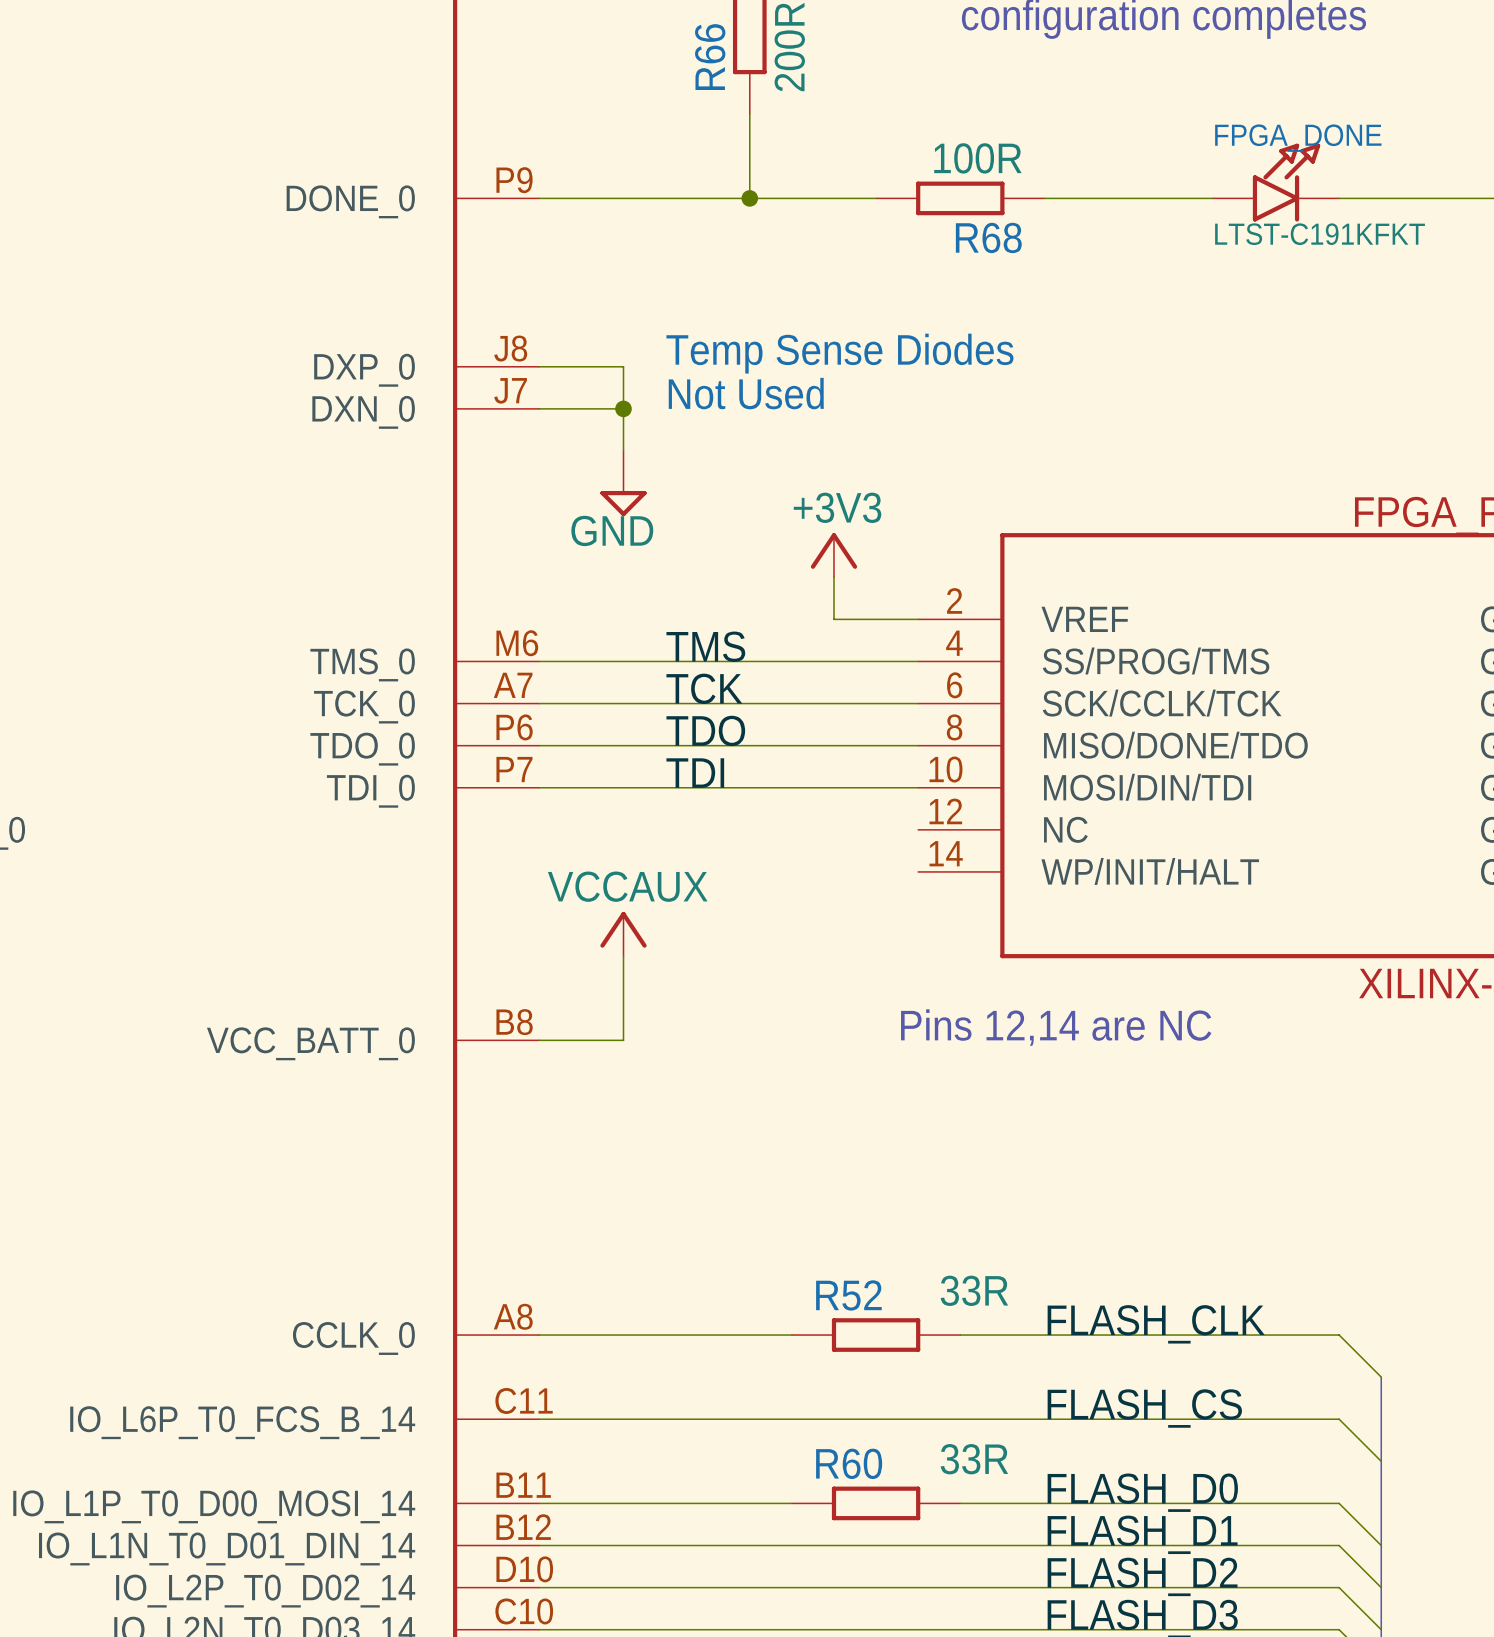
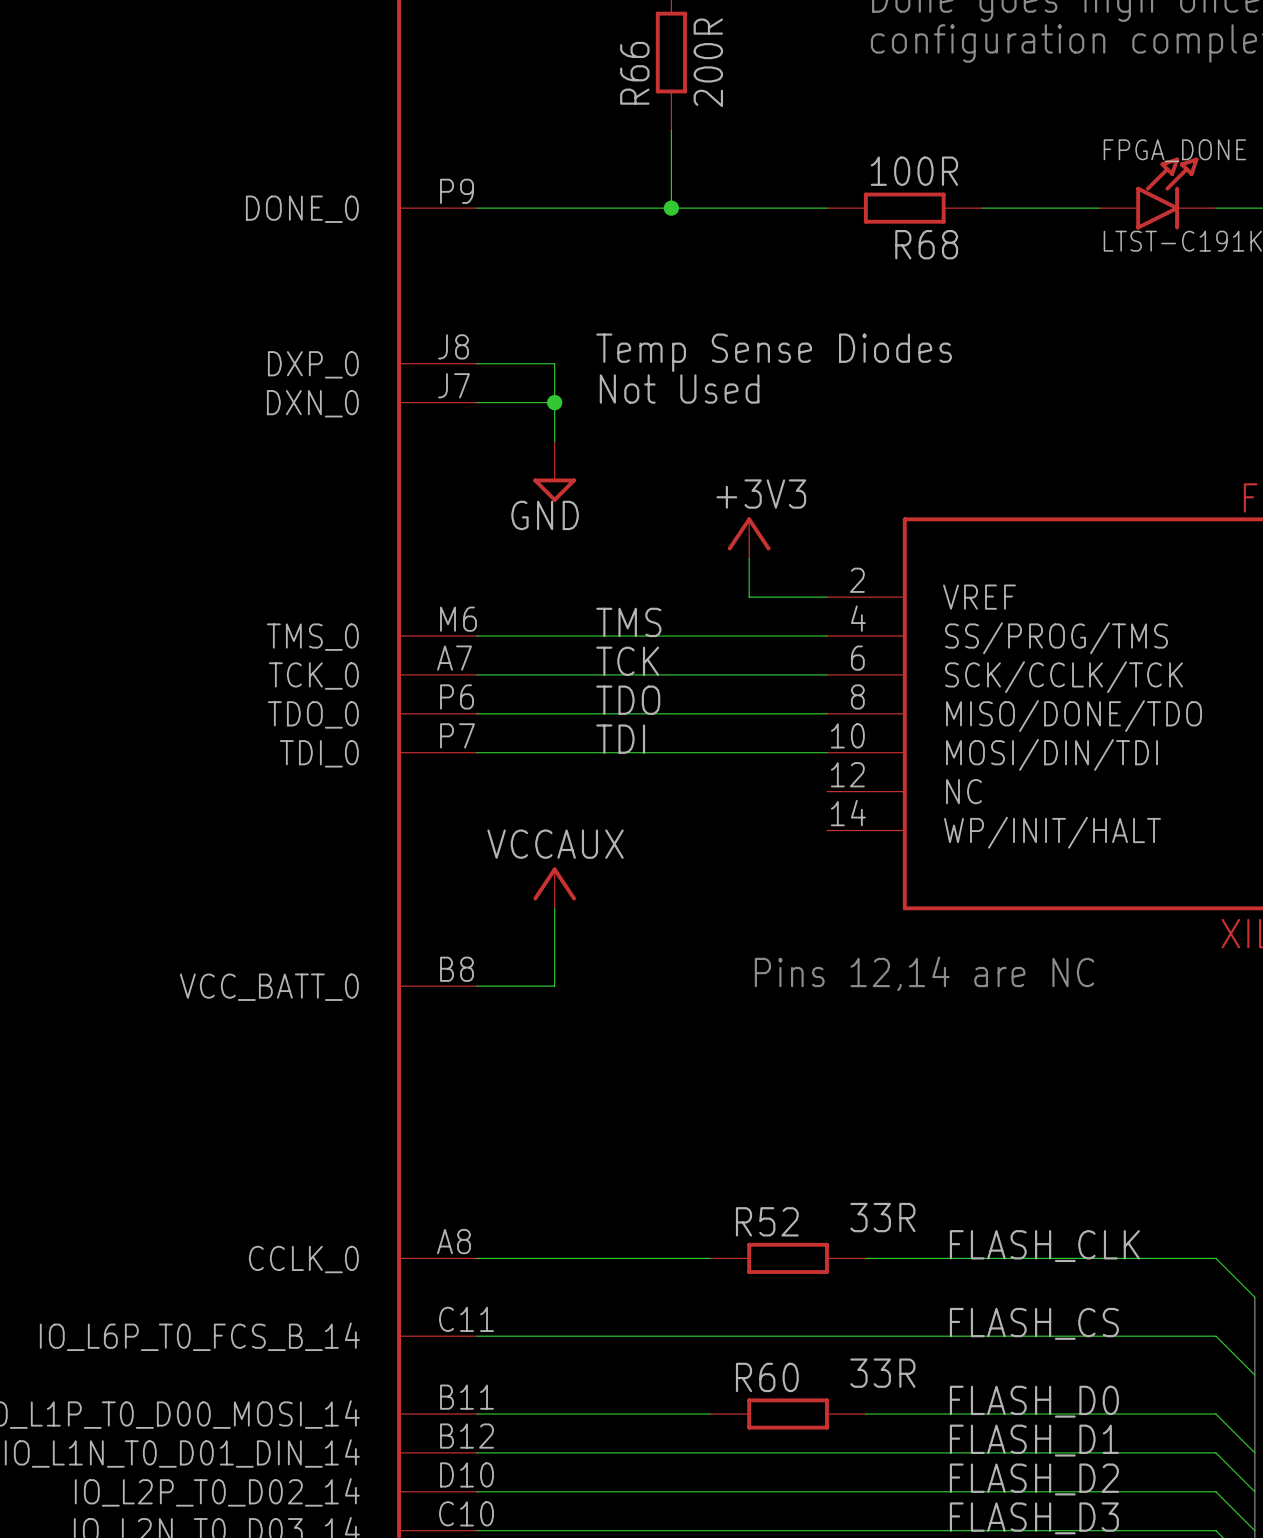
R68 position: (960, 198) -> (904, 208)

